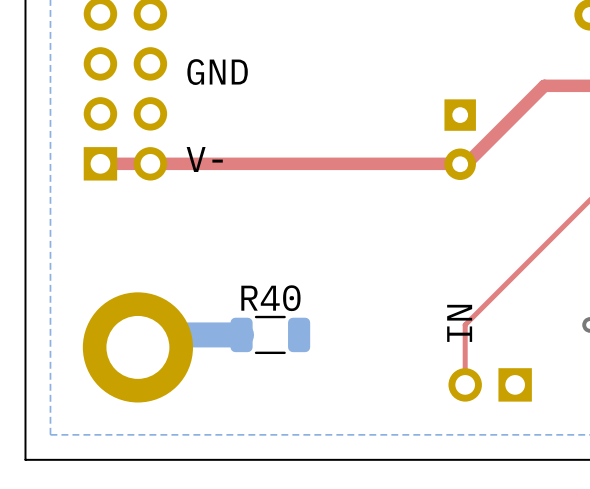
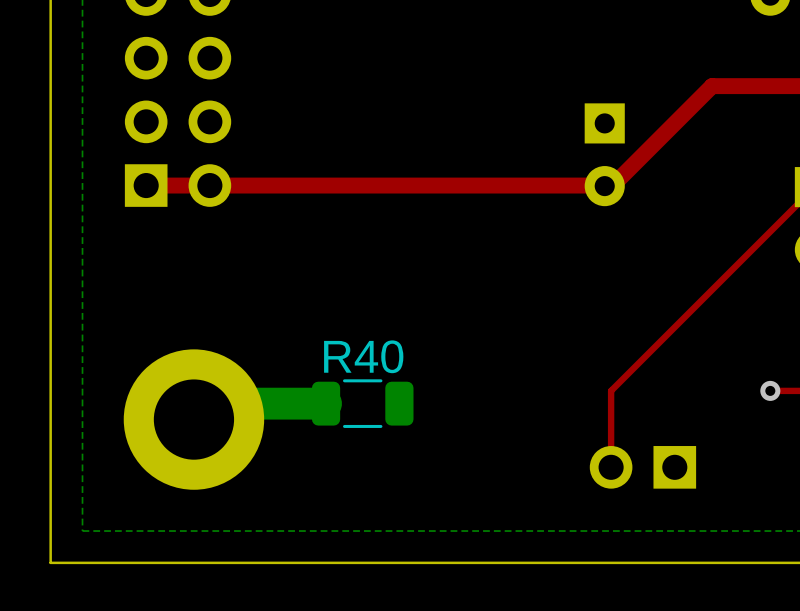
text: GND (217, 72) -> none
text: V- (204, 159) -> none
text: IN (459, 323) -> none

